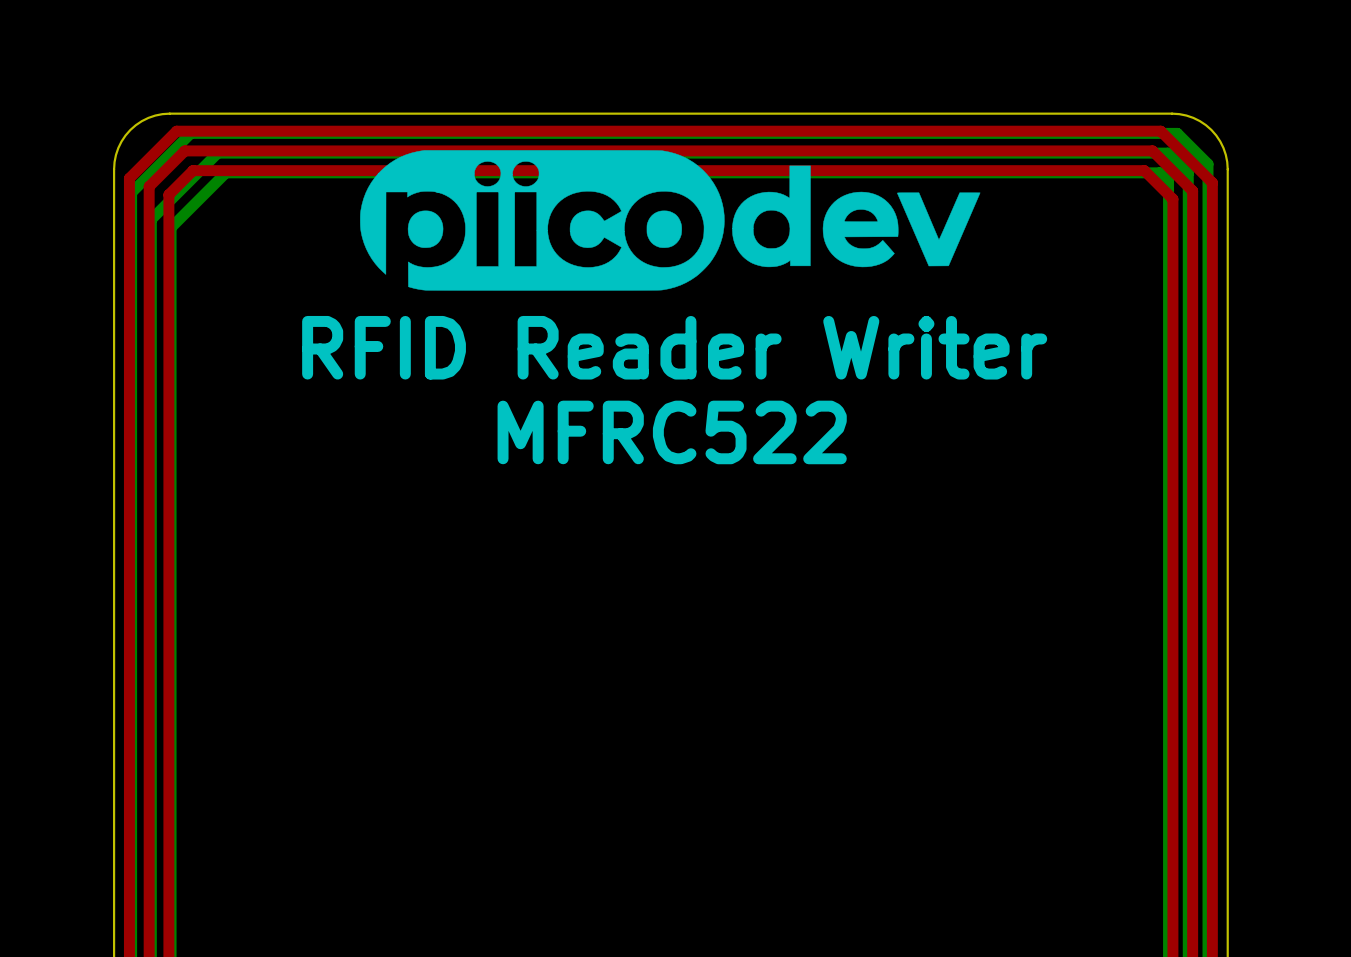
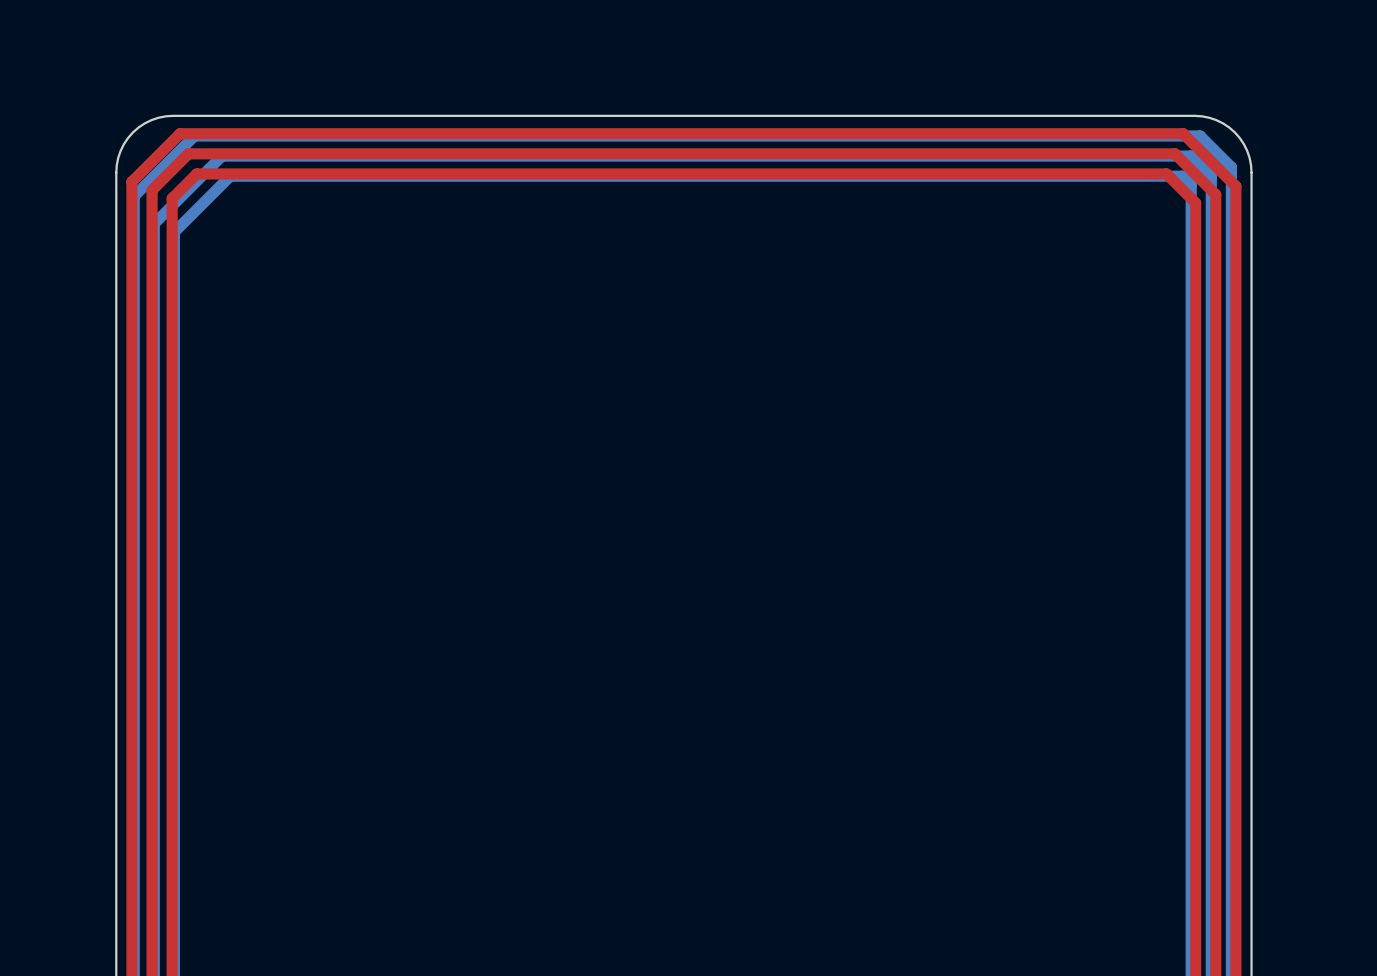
drawing: [360, 150, 981, 291] -> none
text: RFID Reader Writer (674, 347) -> none
text: MFRC522 (672, 432) -> none

